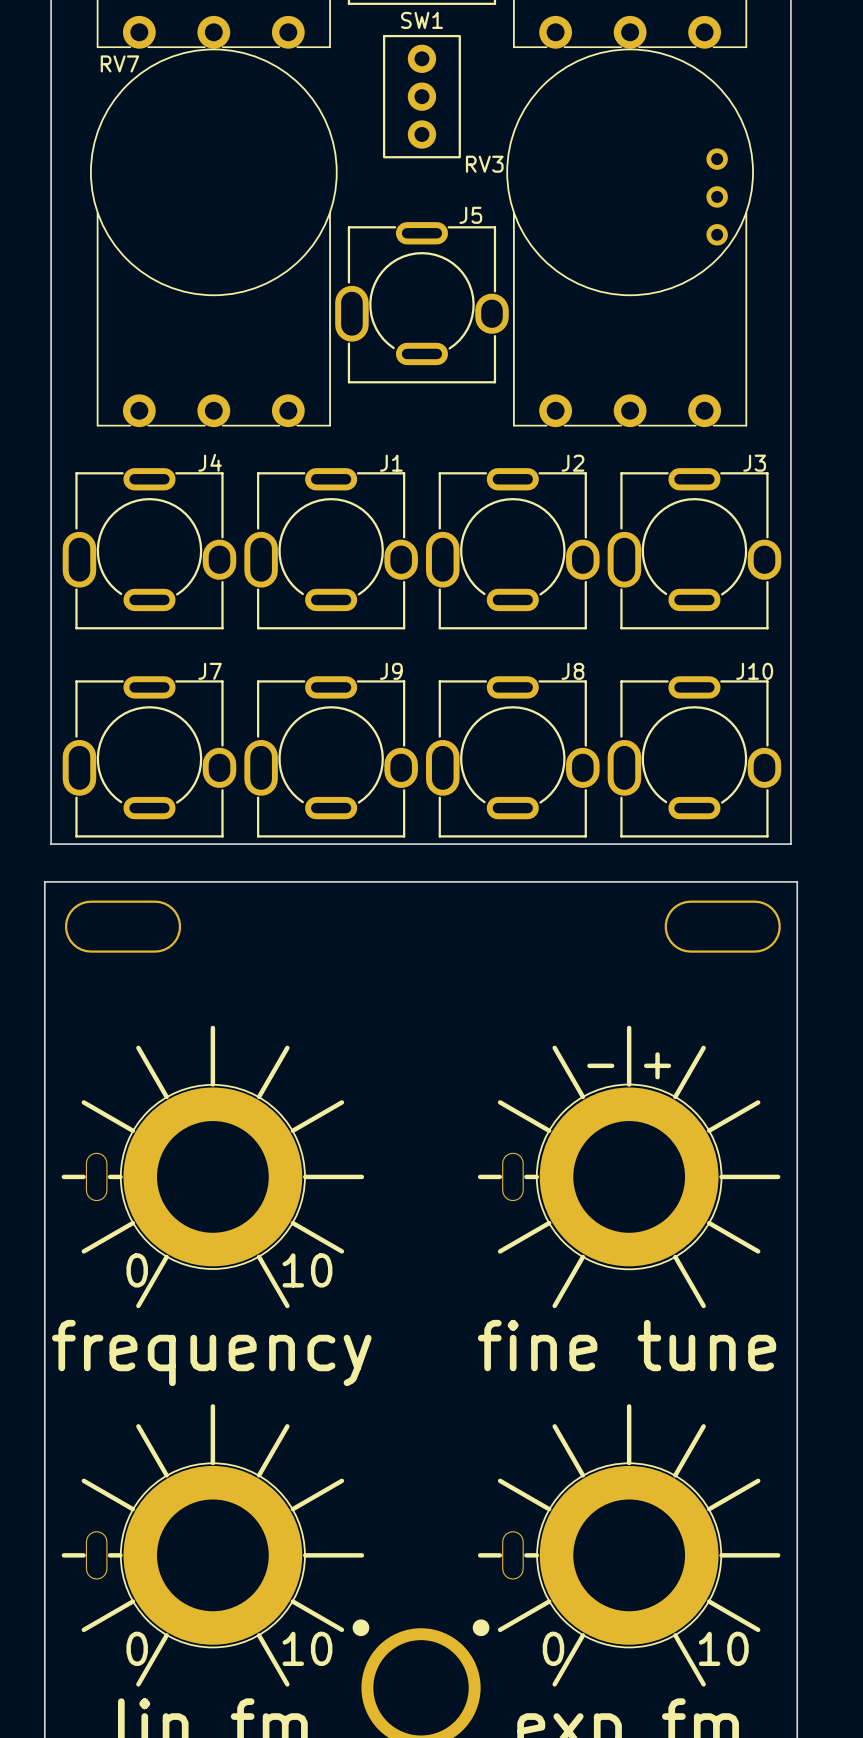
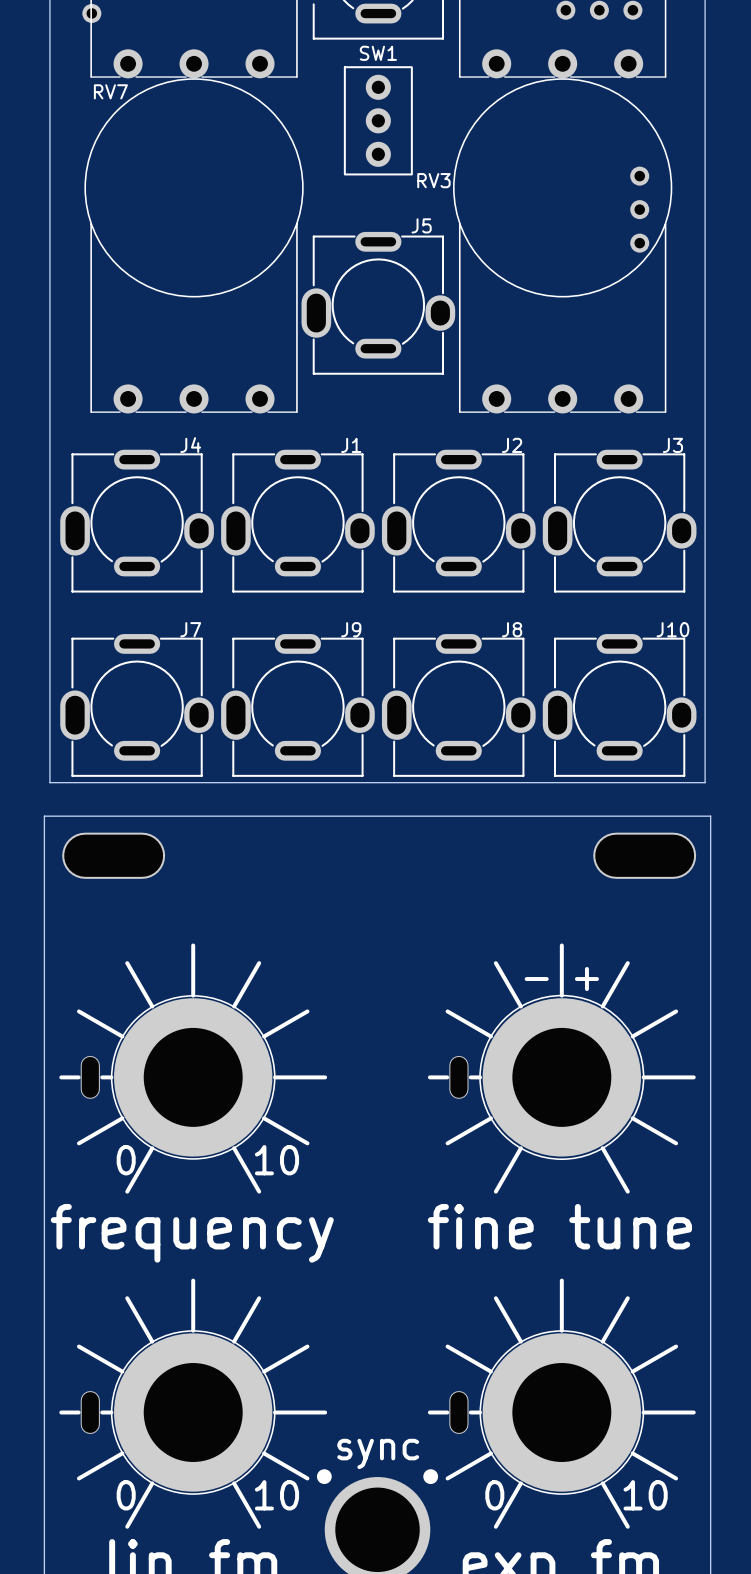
text: none -> sync (378, 1453)

